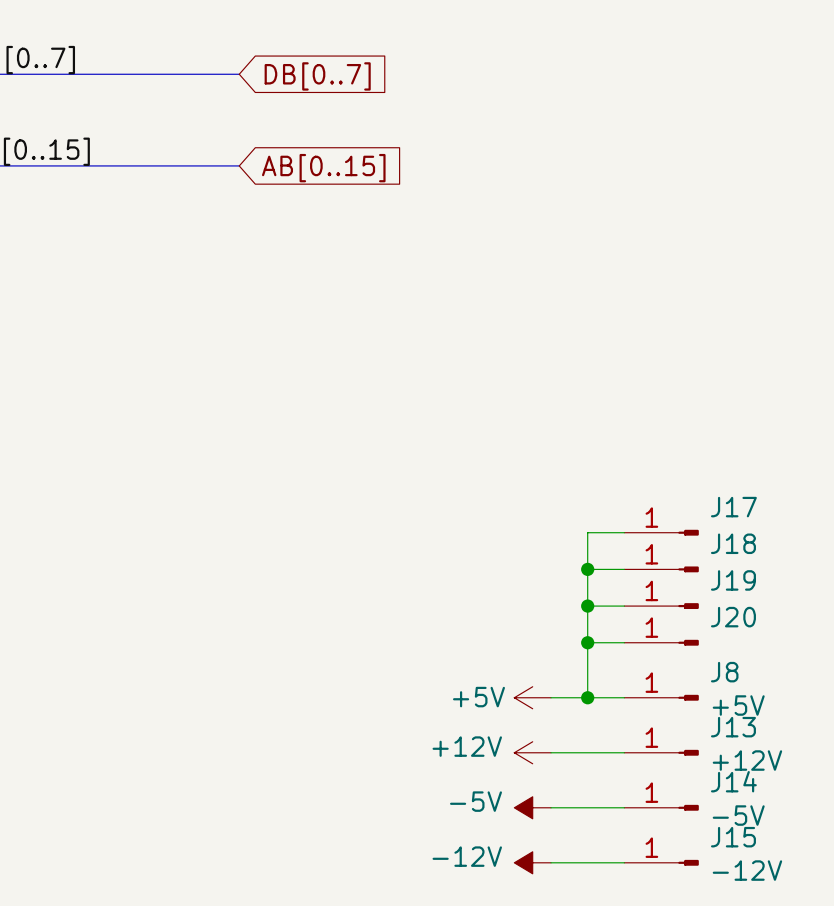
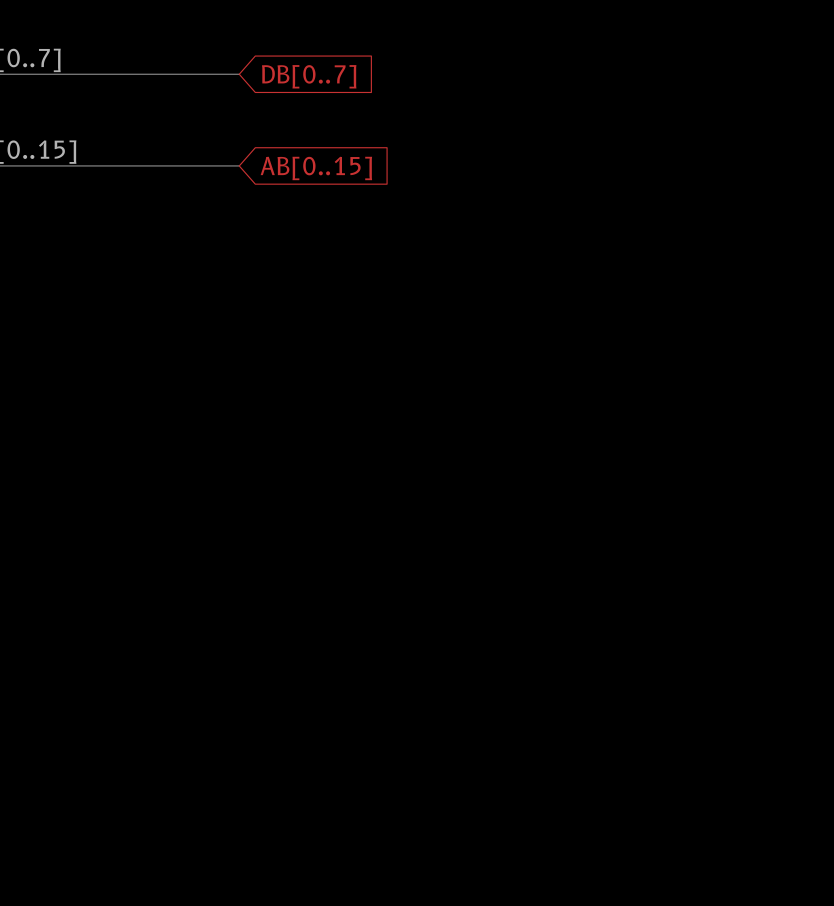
wire: (624, 532) (587, 532) (587, 697) -> none
J17: (661, 532) -> none
wire: (587, 569) (624, 569) -> none
junction: (587, 569) -> none
J18: (661, 569) -> none
wire: (587, 606) (624, 606) -> none
junction: (587, 606) -> none
J19: (661, 606) -> none
wire: (587, 642) (624, 642) -> none
junction: (587, 642) -> none
J20: (661, 642) -> none
power symbol: +5V (532, 697) -> none
wire: (551, 697) (624, 697) -> none
junction: (587, 697) -> none
J8: +5V (661, 697) -> none
power symbol: +12V (532, 752) -> none
wire: (551, 752) (624, 752) -> none
J13: +12V (661, 752) -> none
power symbol: -5V (532, 807) -> none
wire: (551, 807) (624, 807) -> none
J14: -5V (661, 807) -> none
power symbol: -12V (532, 862) -> none
wire: (551, 862) (624, 862) -> none
J15: -12V (661, 862) -> none

